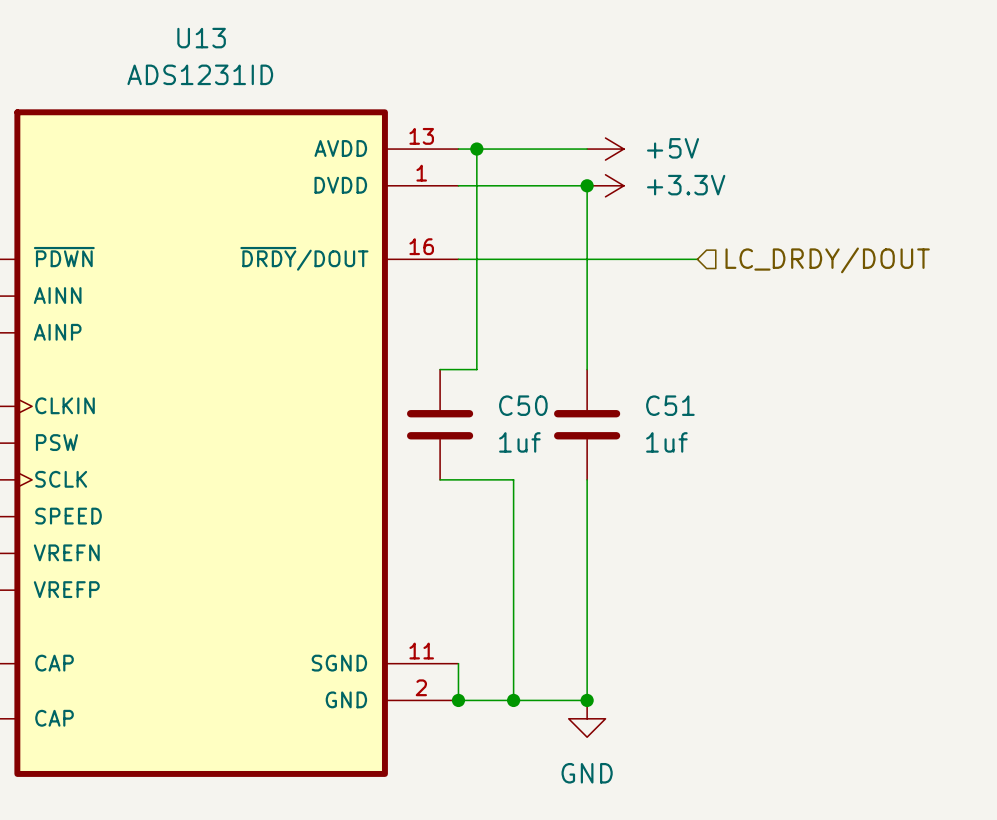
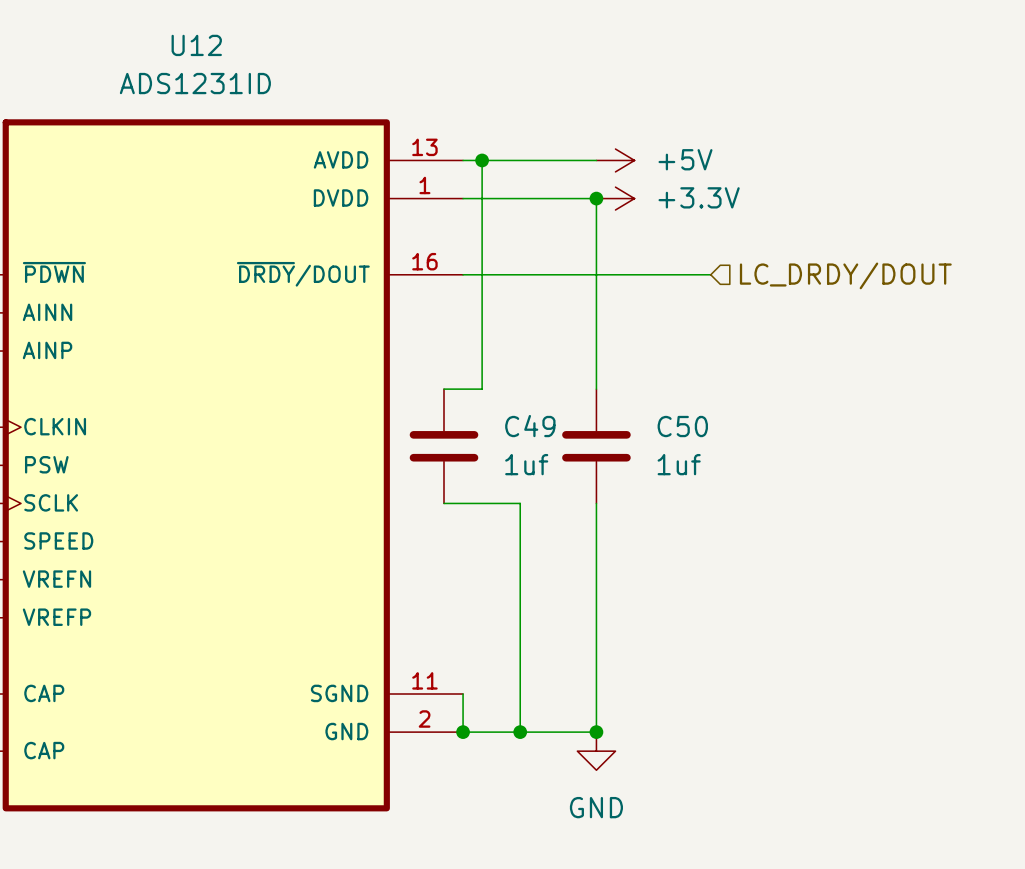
U13 name: U13 (201, 38) -> U12 (196, 45)
C50 name: C50 (523, 405) -> C49 (530, 426)
C51 name: C51 (670, 405) -> C50 (682, 426)

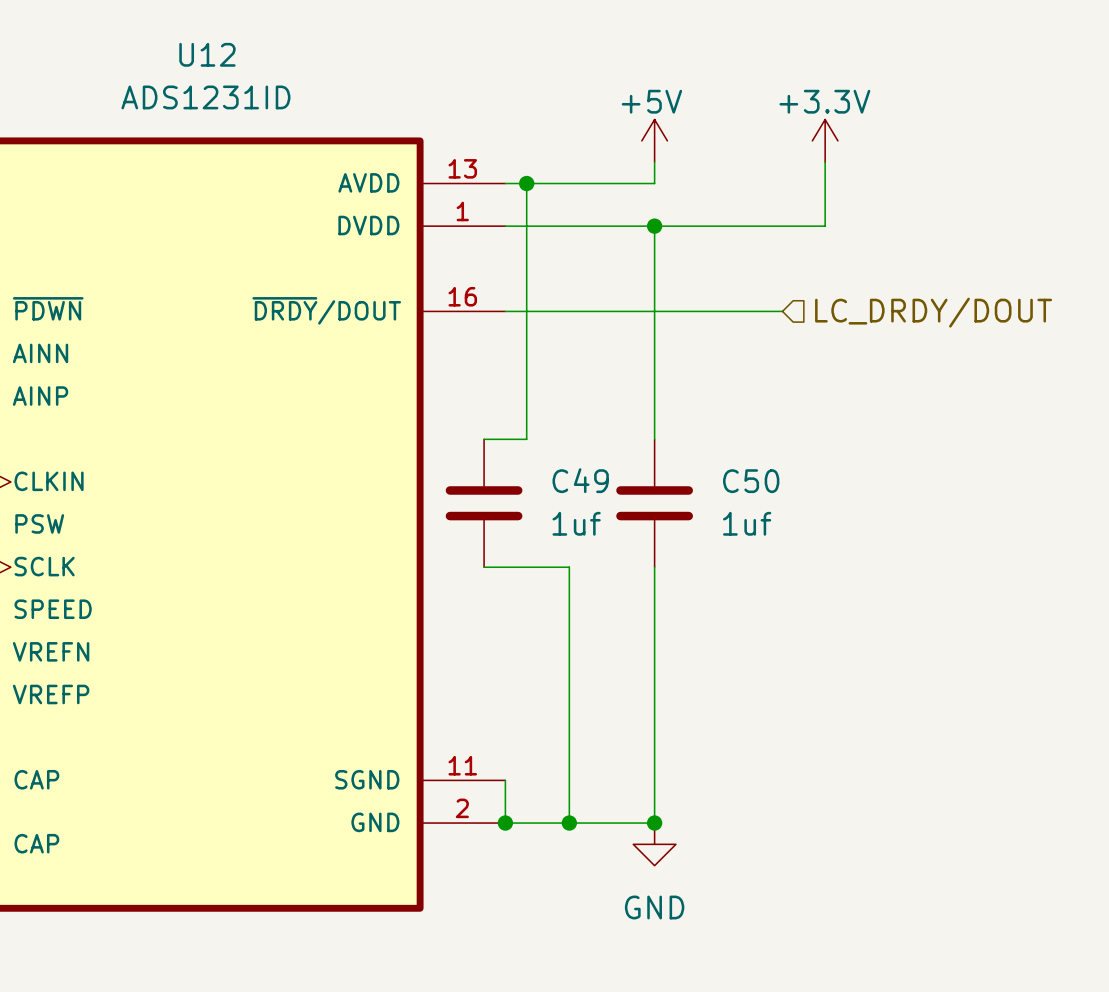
wire: none -> (654, 162) (654, 183)
wire: none -> (825, 162) (825, 226) (654, 226)
power symbol text position: +5V (685, 159) -> +5V (651, 101)
power symbol rotation: 0° (615, 160) -> 90° counterclockwise (654, 140)
power symbol position: +5V (615, 160) -> +5V (654, 140)
power symbol text position: +3.3V (699, 197) -> +3.3V (824, 101)
power symbol rotation: 0° (615, 198) -> 90° counterclockwise (825, 140)
power symbol position: +3.3V (615, 198) -> +3.3V (825, 140)

